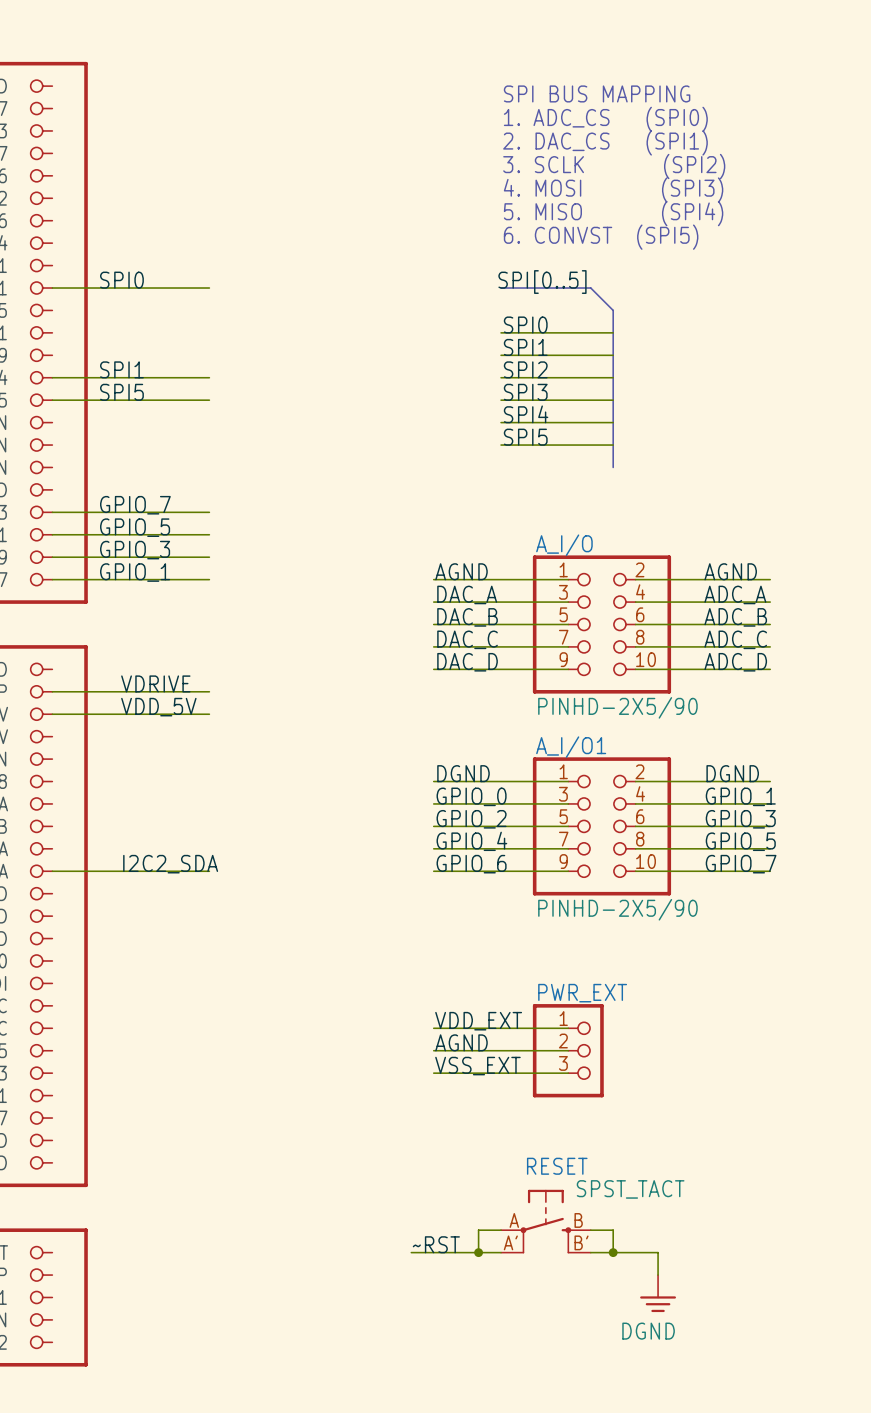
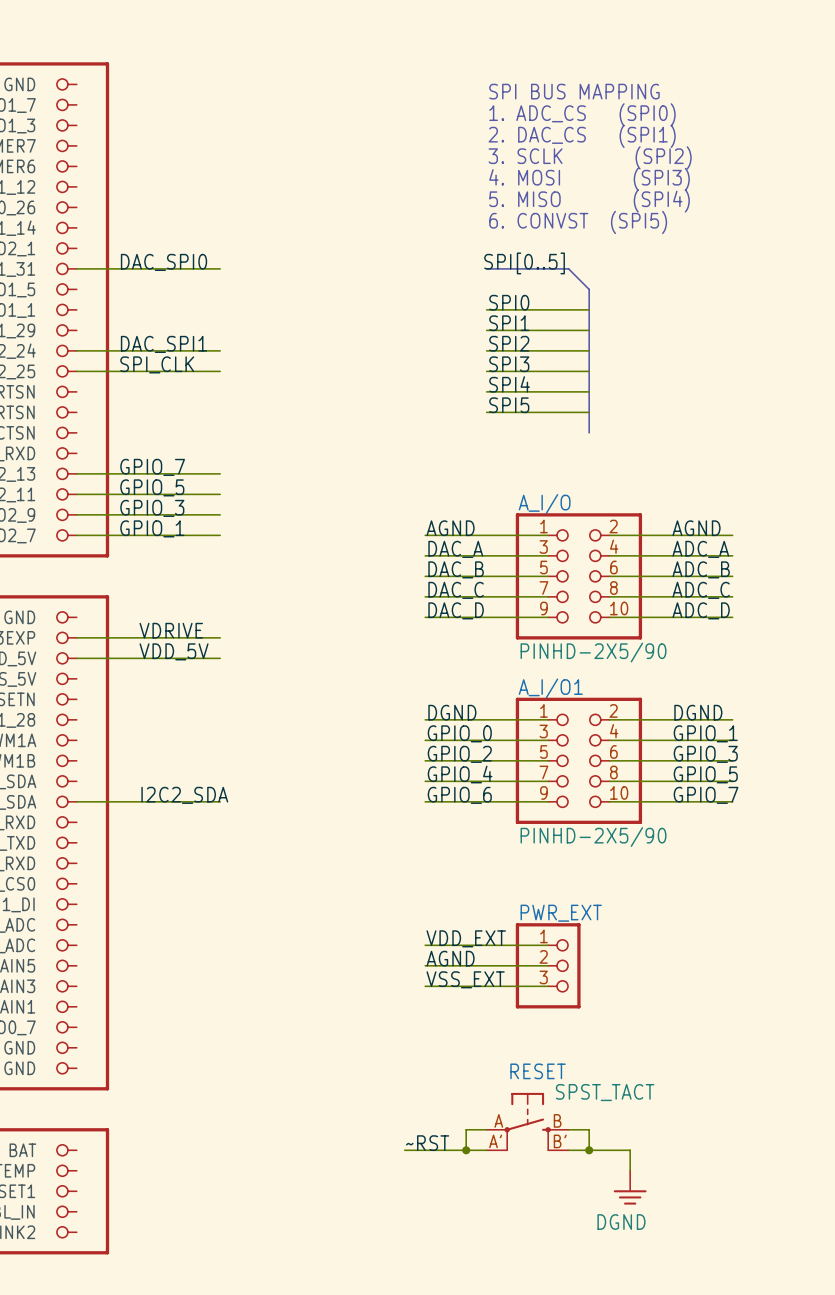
label: SPI0 (121, 280) -> DAC_SPI0 (163, 262)
label: SPI1 (121, 369) -> DAC_SPI1 (163, 344)
label: SPI5 (121, 392) -> SPI_CLK (157, 364)

